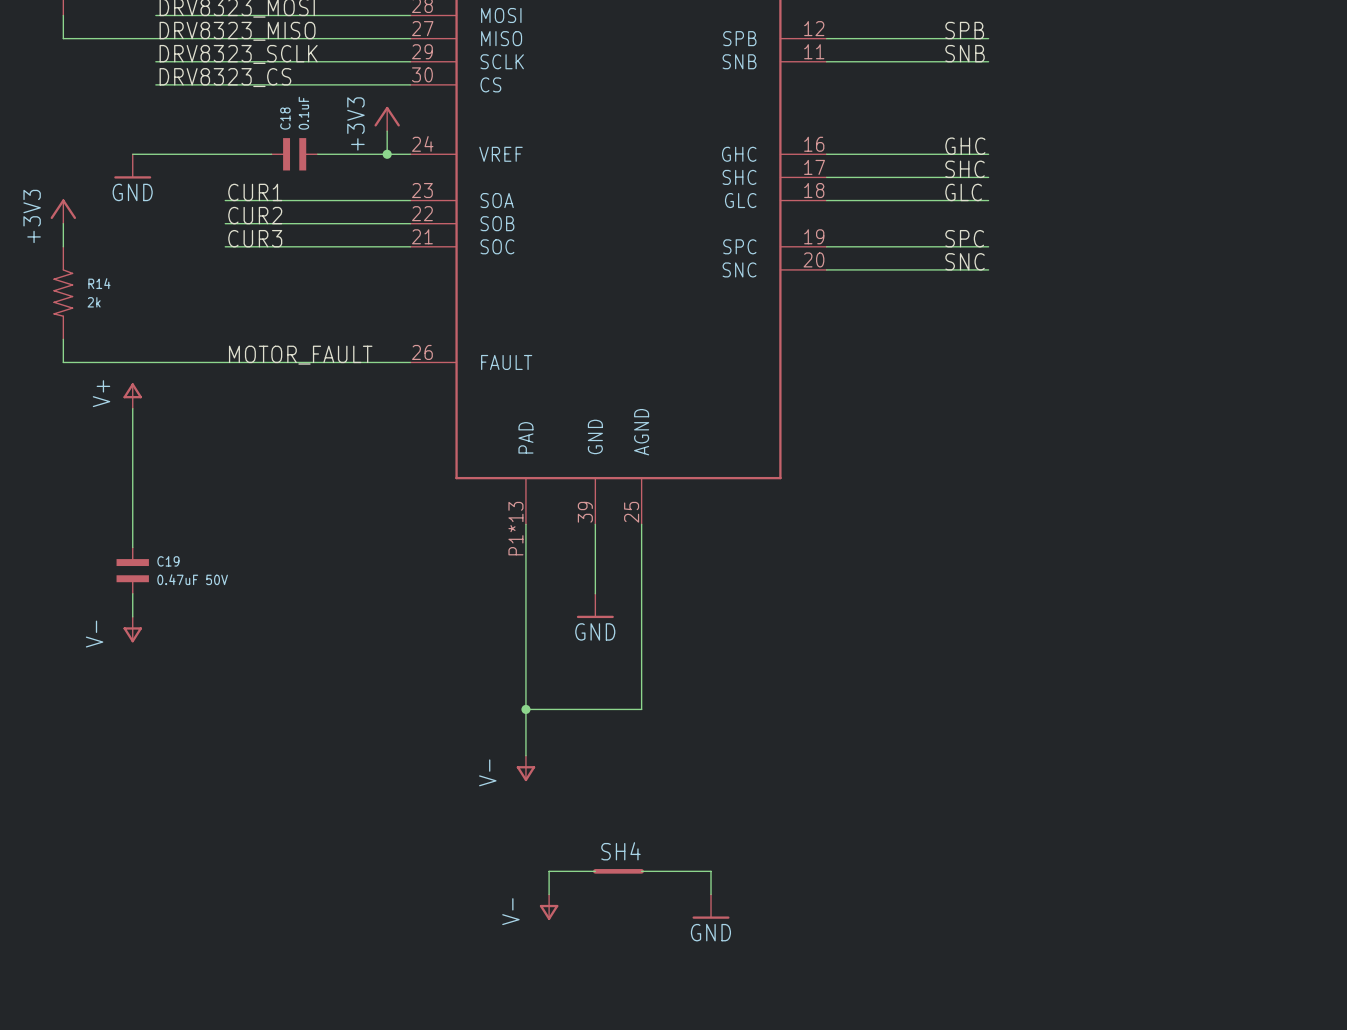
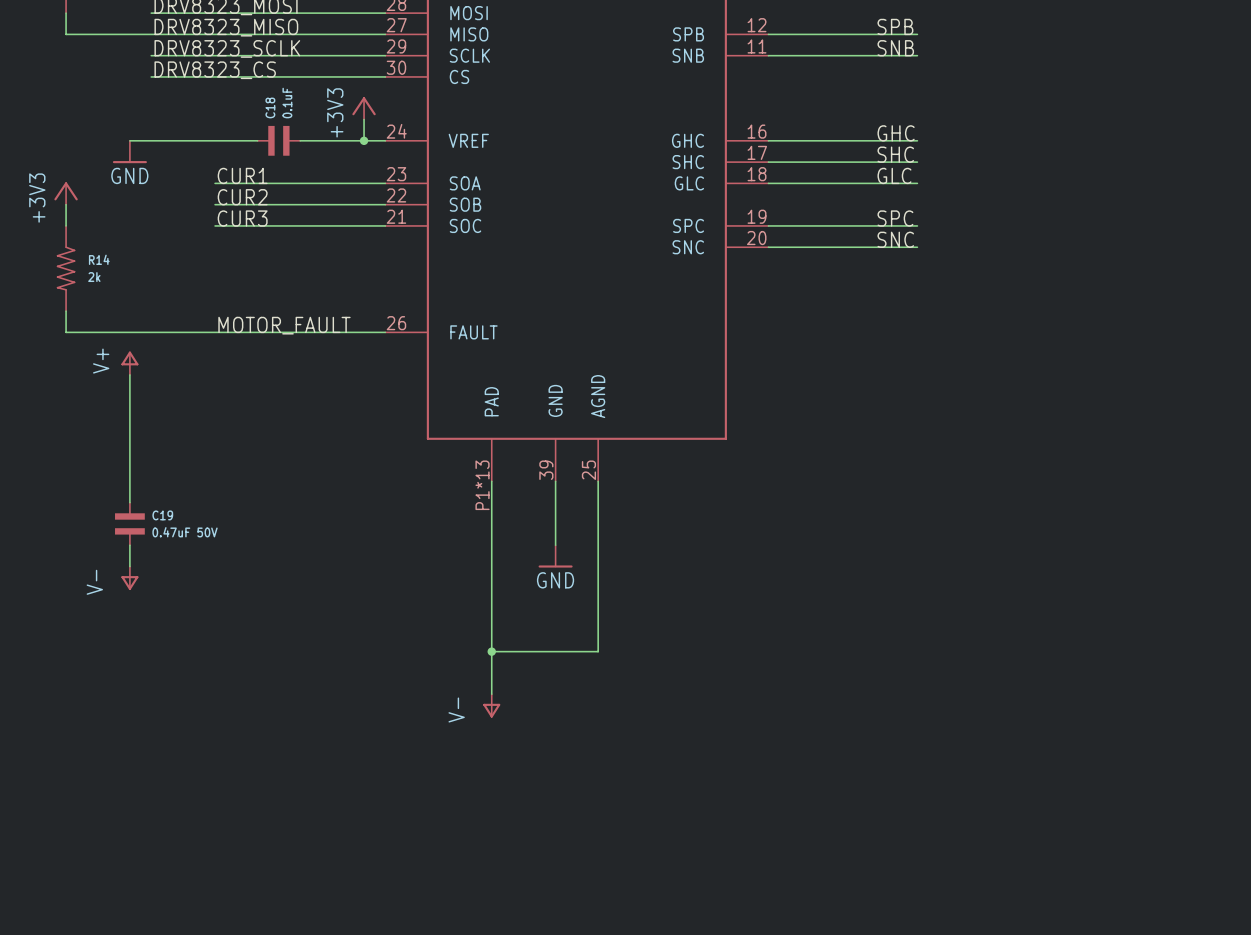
wire: (595, 871) (549, 871) (549, 894) -> none
SH4: (618, 871) -> none
wire: (641, 871) (711, 871) (711, 894) -> none
power symbol: GND (711, 906) -> none
power symbol: V- (549, 907) -> none

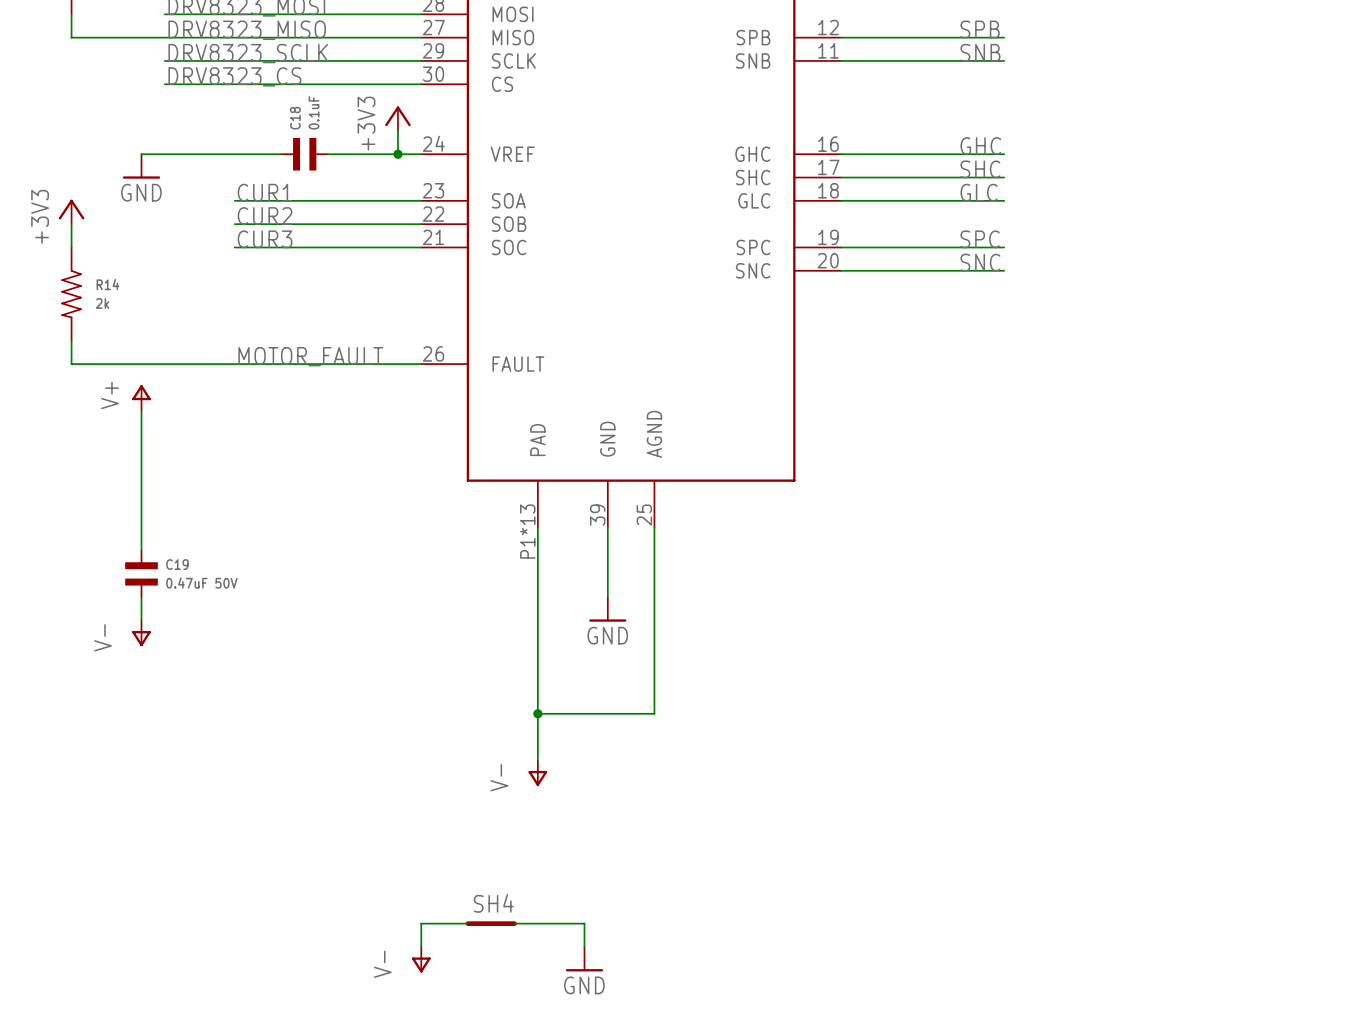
wire: none -> (467, 923) (421, 923) (421, 946)
SH4: none -> (491, 923)
wire: none -> (514, 923) (584, 923) (584, 946)
power symbol: none -> GND (584, 959)
power symbol: none -> V- (421, 959)

